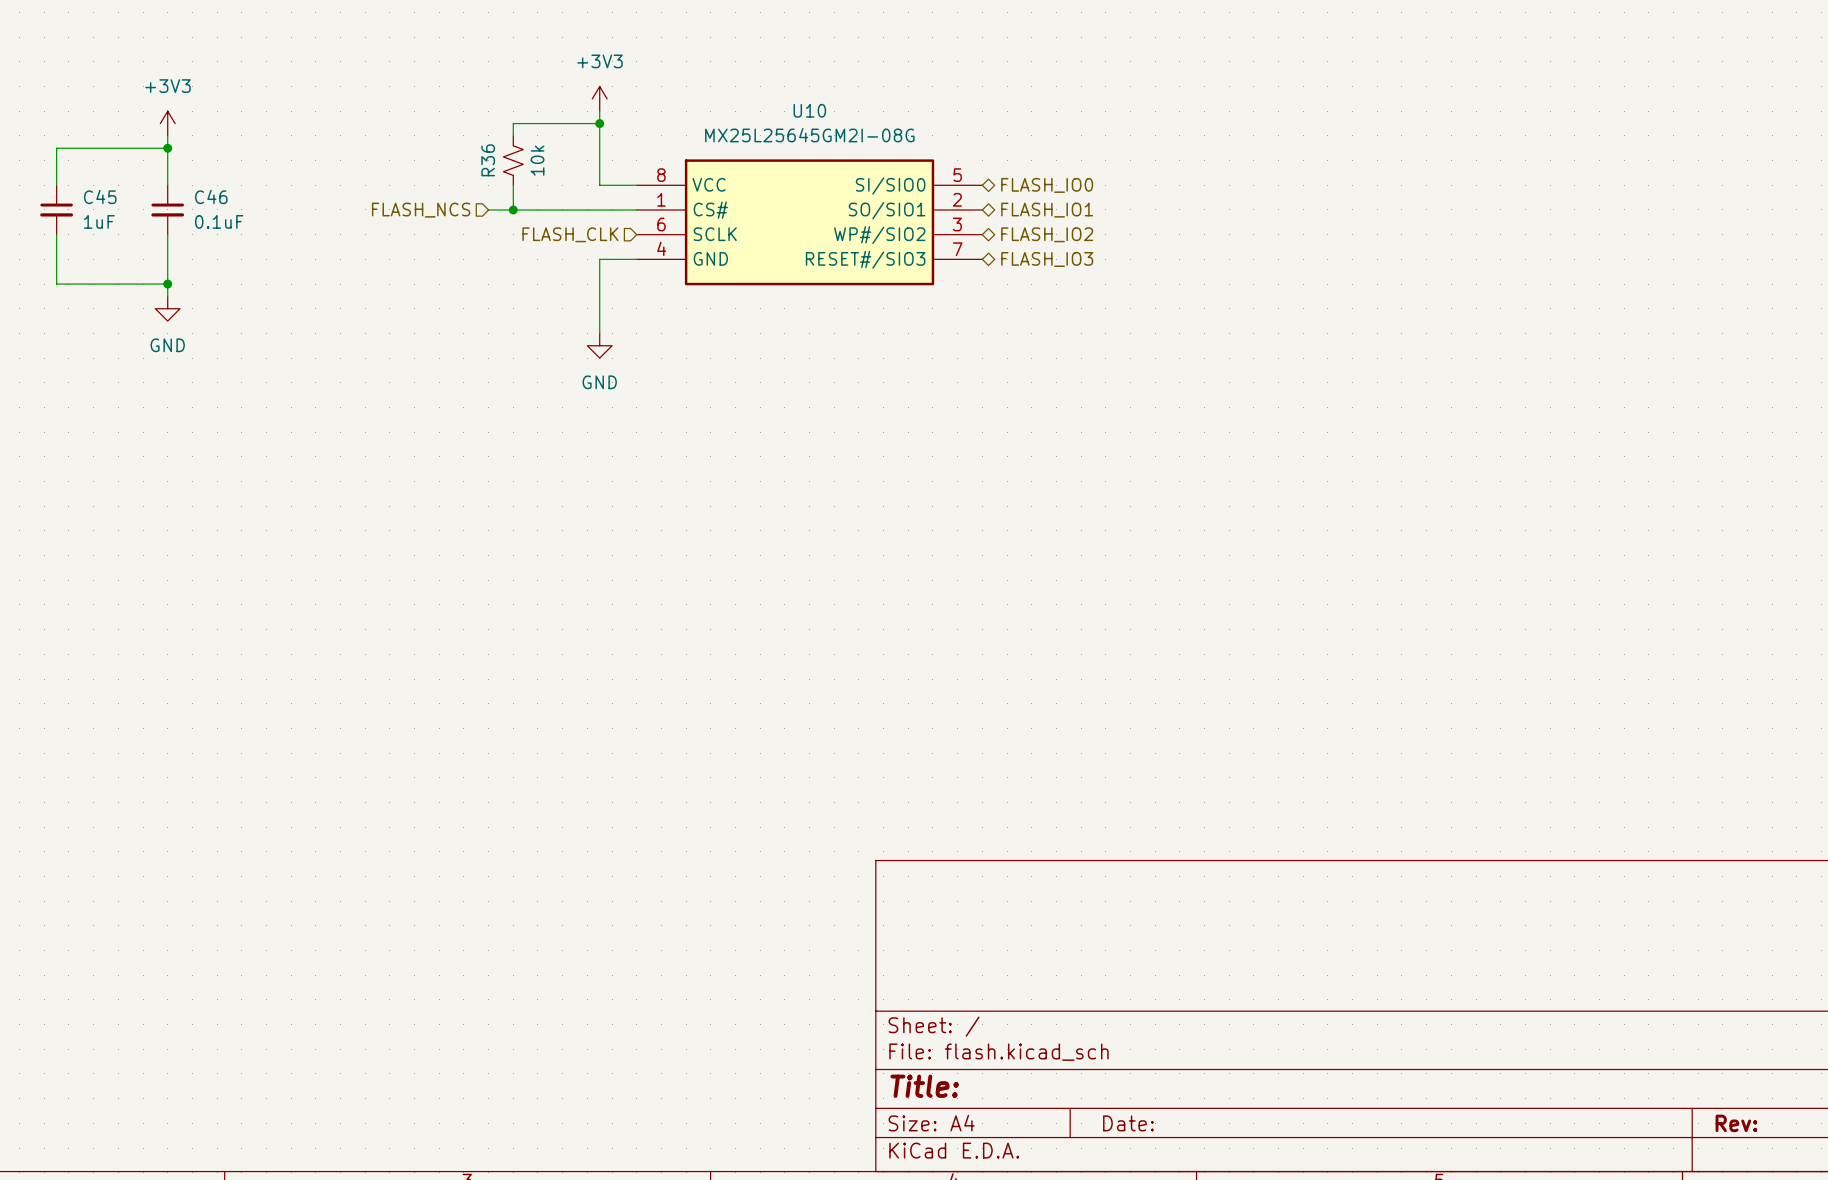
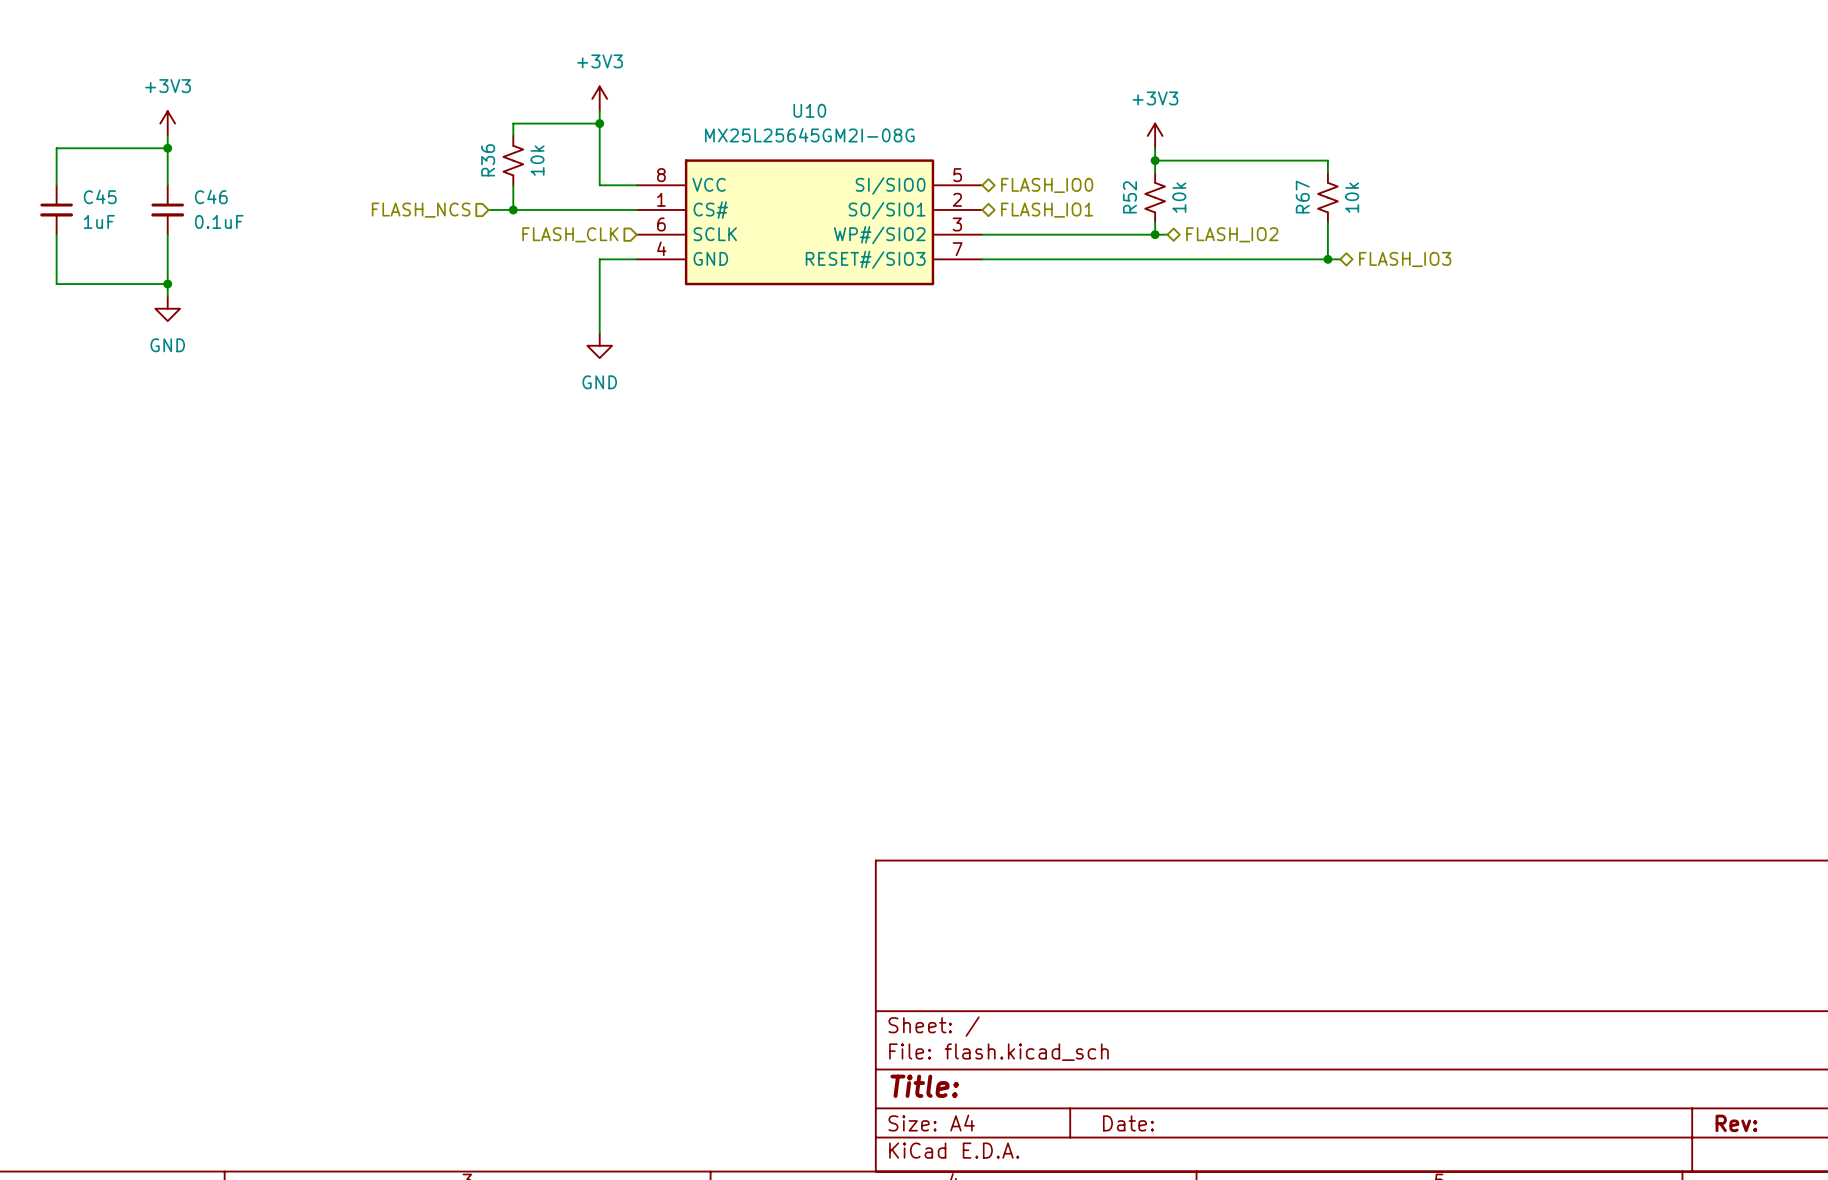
power symbol: none -> +3V3 (1155, 135)
wire: none -> (1155, 148) (1155, 172)
wire: none -> (1155, 160) (1327, 160) (1327, 172)
junction: none -> (1155, 160)
R52: none -> 10k (1155, 197)
R67: none -> 10k (1327, 197)
wire: none -> (1155, 222) (1155, 234)
wire: none -> (1327, 222) (1327, 259)
wire: none -> (982, 234) (1167, 234)
hierarchical label position: FLASH_IO2 (1047, 234) -> FLASH_IO2 (1232, 234)
junction: none -> (1155, 234)
wire: none -> (982, 259) (1340, 259)
hierarchical label: FLASH_IO3 (1047, 259) -> none
junction: none -> (1327, 259)
hierarchical label: none -> FLASH_IO3 (1405, 259)

